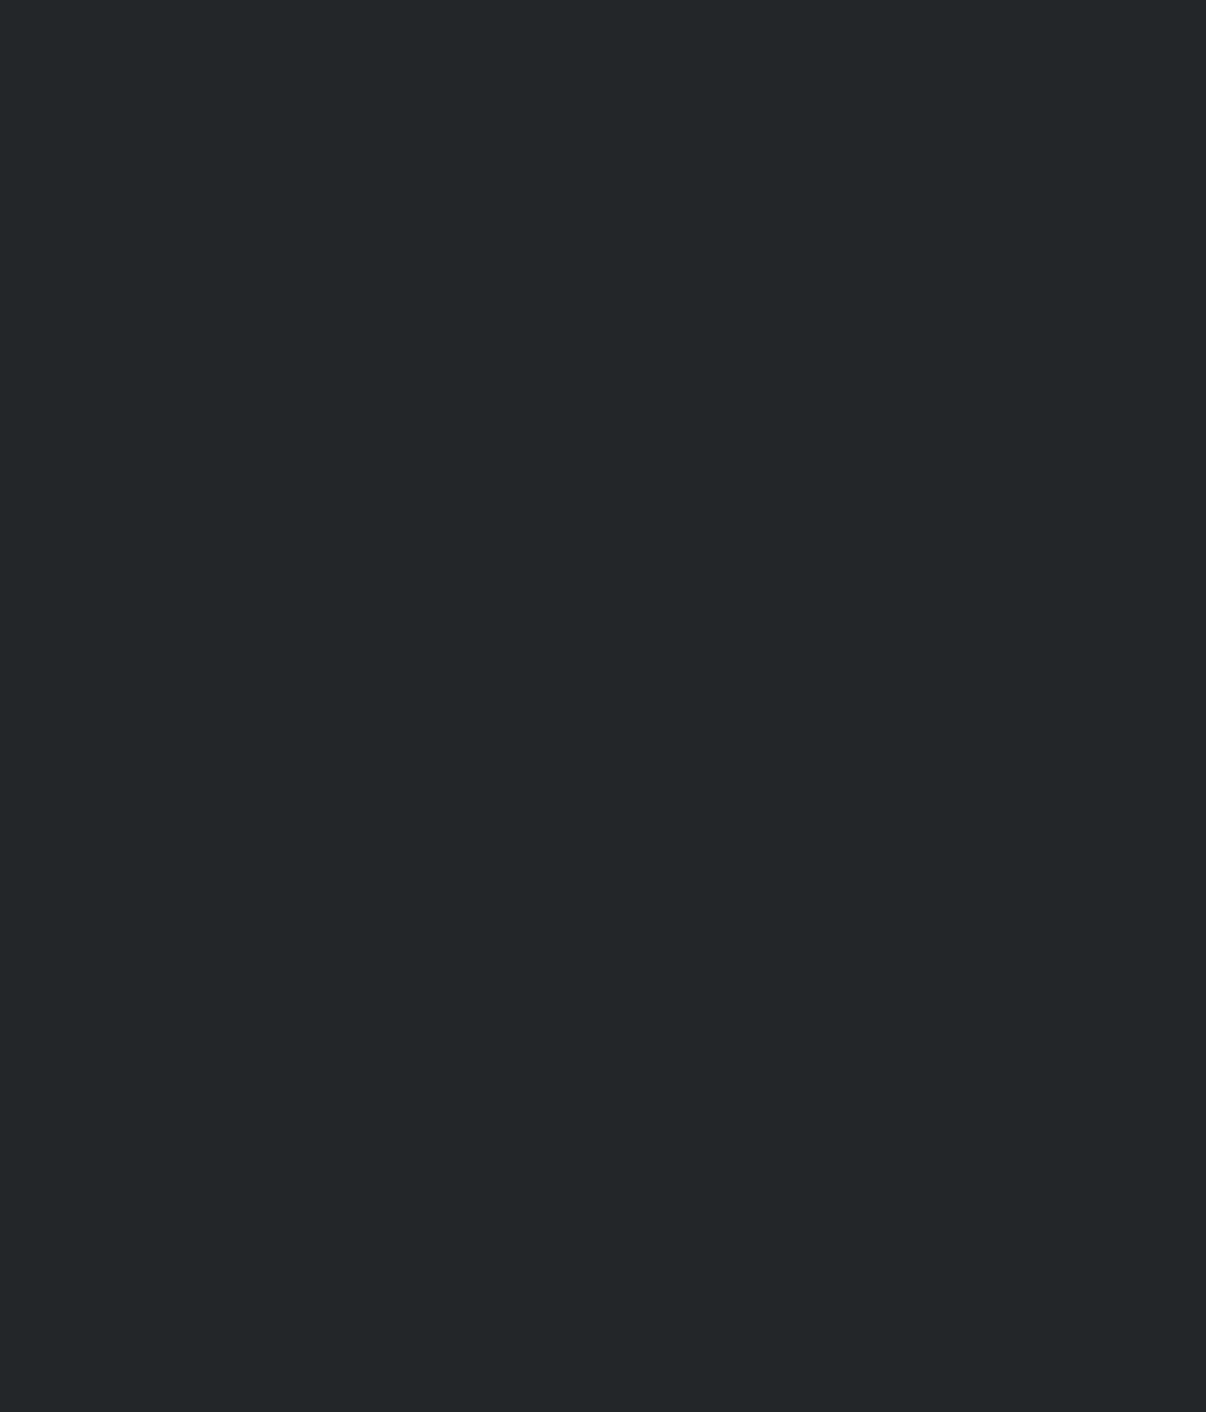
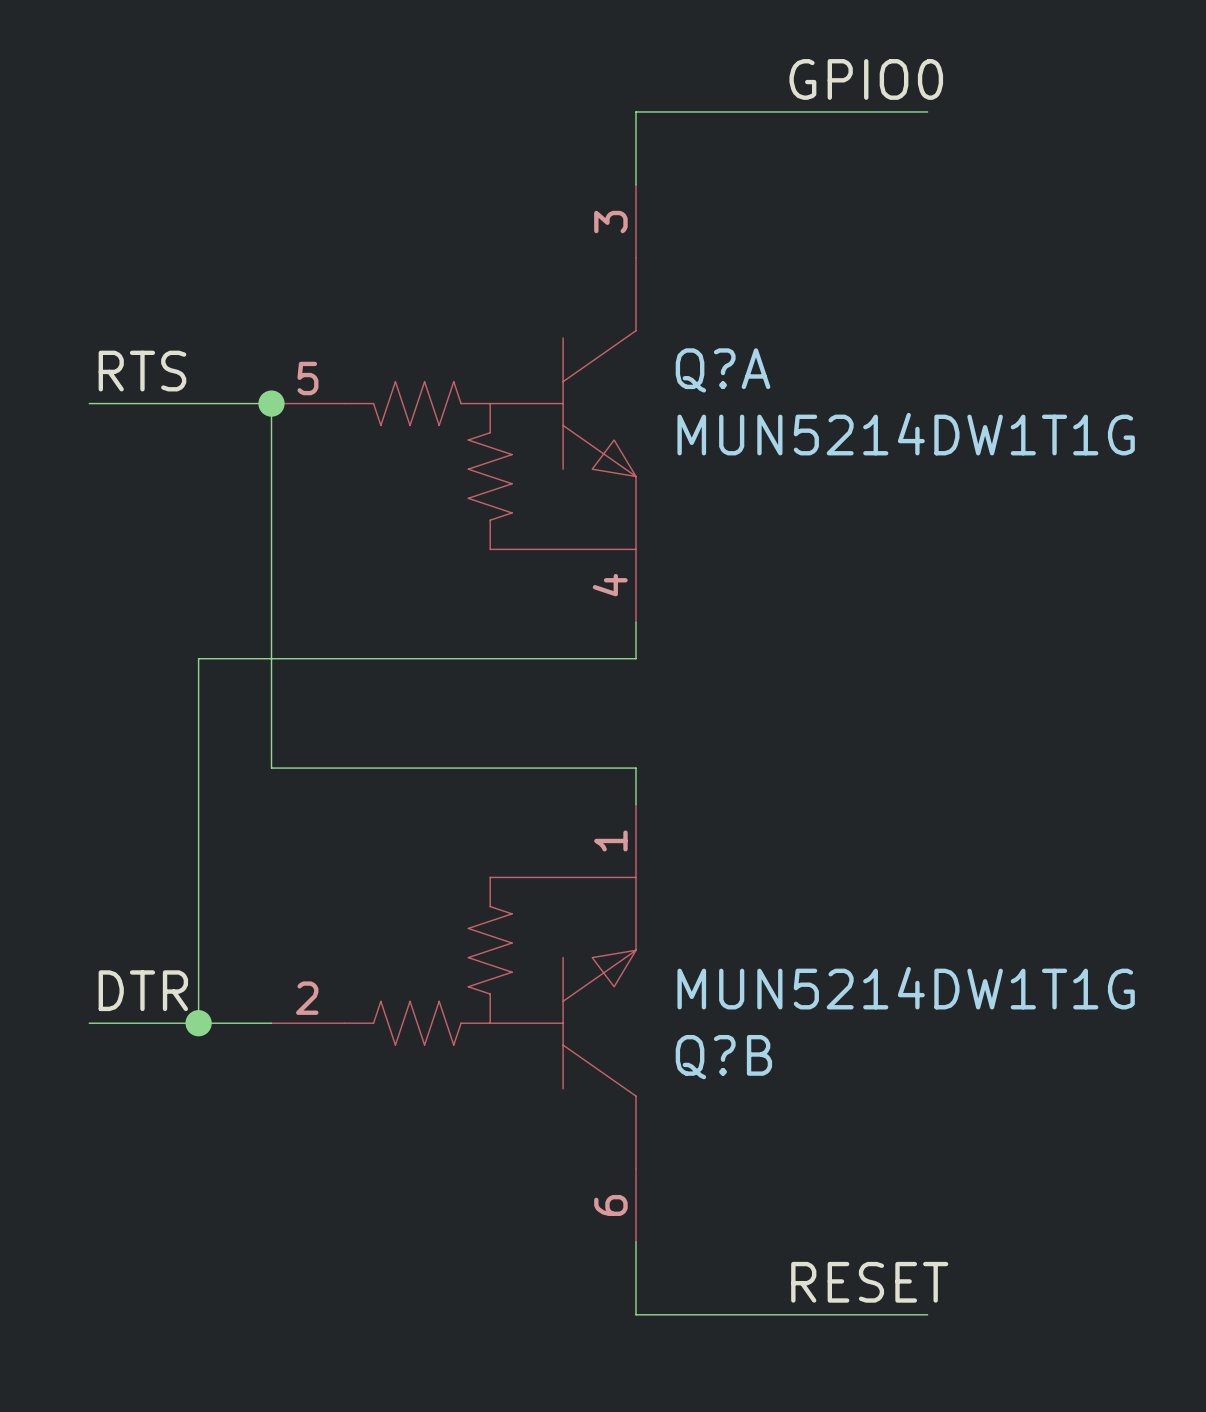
label: none -> GPIO0 (866, 79)
wire: none -> (927, 111) (636, 111) (636, 184)
label: none -> RTS (142, 371)
wire: none -> (89, 403) (271, 403) (271, 768) (636, 768) (636, 804)
junction: none -> (271, 403)
Q?A: none -> MUN5214DW1T1G (453, 403)
wire: none -> (636, 622) (636, 658) (198, 658) (198, 1023)
label: none -> DTR (143, 990)
wire: none -> (89, 1023) (271, 1023)
junction: none -> (198, 1023)
Q?B: none -> MUN5214DW1T1G (453, 1023)
wire: none -> (636, 1241) (636, 1314) (927, 1314)
label: none -> RESET (869, 1282)

